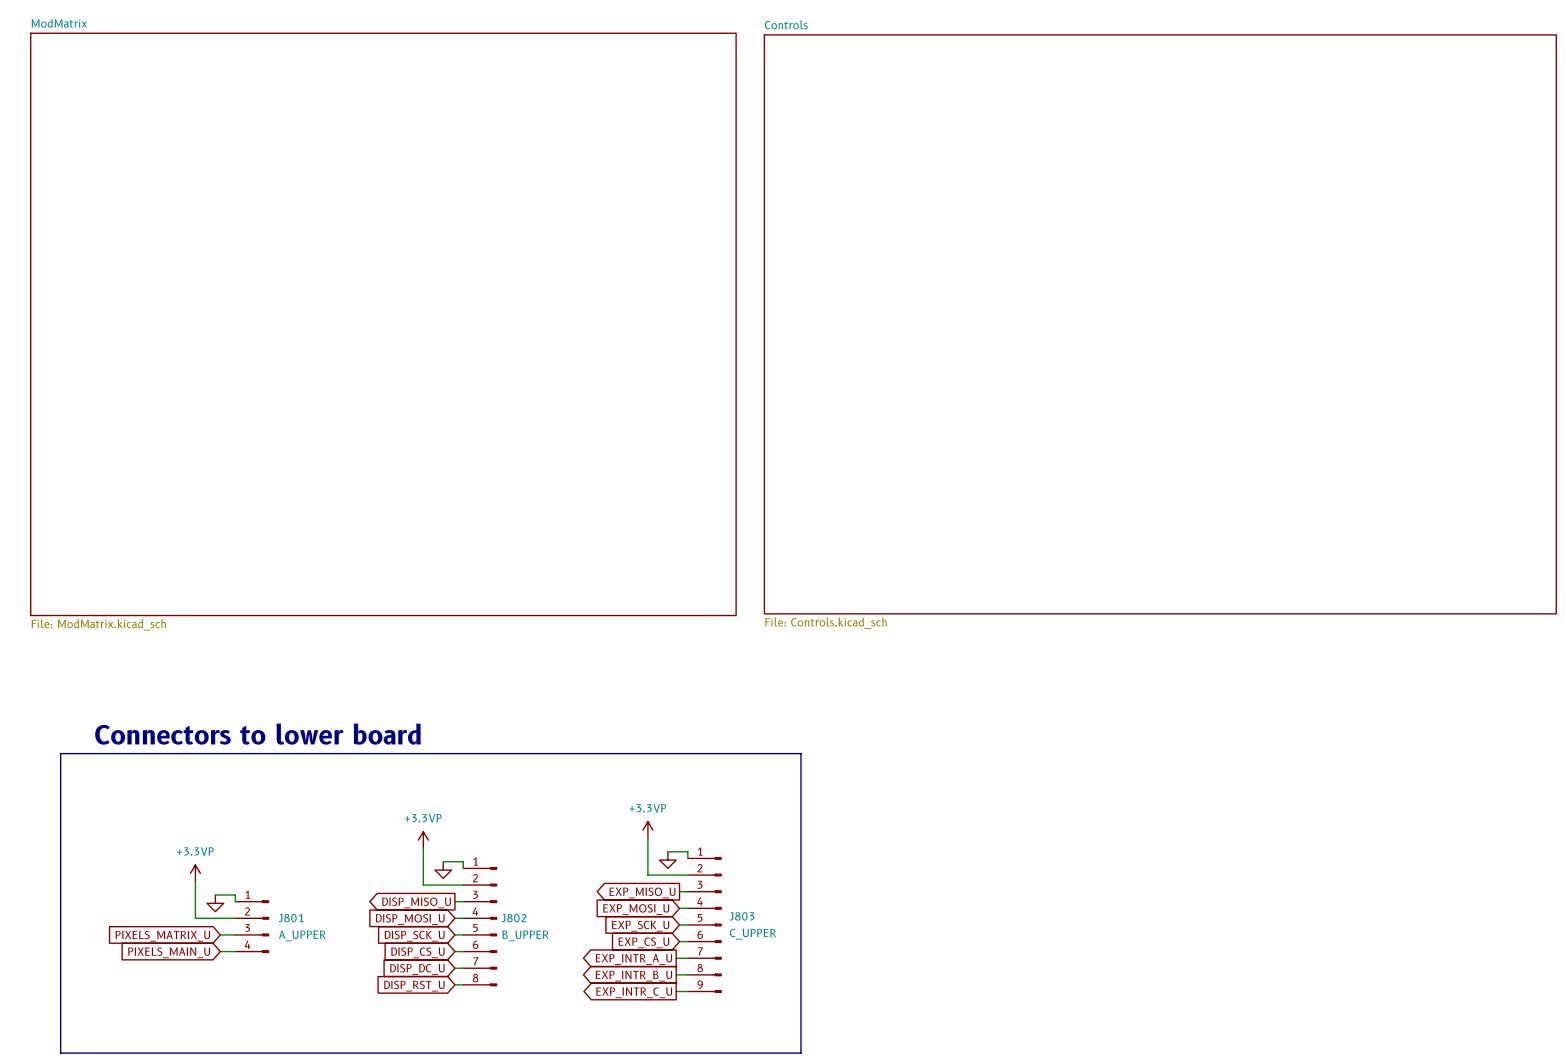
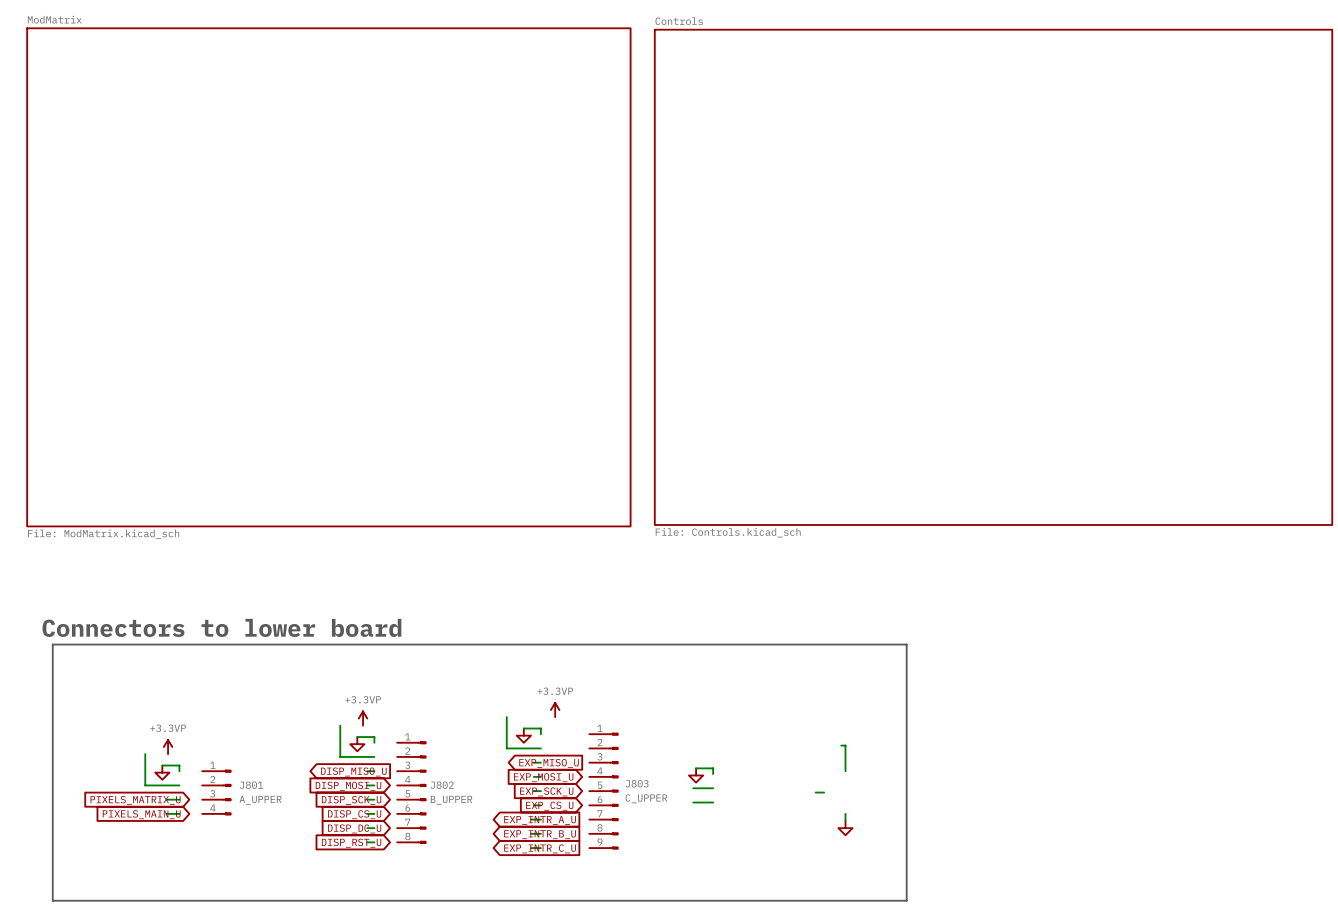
line: (800, 753) (800, 1053) -> (686, 644) (906, 644) (906, 900) (686, 900)
wire: (647, 838) (647, 875) (687, 875) -> (506, 717) (506, 748) (540, 748)
wire: (423, 848) (423, 885) -> (340, 725) (340, 756) (363, 756)
wire: (667, 851) (687, 851) (687, 858) -> (523, 728) (540, 728) (540, 734)
power symbol position: (667, 860) -> (523, 735)
wire: (443, 861) (463, 861) (463, 868) -> (357, 737) (374, 737) (374, 742)
power symbol position: (443, 870) -> (357, 744)
wire: none -> (841, 745) (845, 745) (845, 771)
wire: (195, 881) (195, 918) -> (145, 754) (145, 785) (168, 785)
wire: (436, 885) (463, 885) -> none
wire: (679, 891) (687, 891) -> (533, 762) (540, 762)
wire: (215, 895) (235, 895) (235, 901) -> (162, 765) (179, 765) (179, 771)
wire: none -> (696, 768) (713, 768) (713, 774)
wire: (454, 901) (463, 901) -> (367, 771) (374, 771)
power symbol position: (215, 903) -> (162, 772)
power symbol: none -> (696, 775)
wire: (679, 908) (687, 908) -> (533, 776) (540, 776)
wire: (208, 918) (235, 918) -> none
wire: (454, 918) (463, 918) -> (367, 785) (374, 785)
wire: none -> (693, 788) (713, 788)
wire: (679, 924) (687, 924) -> (533, 791) (540, 791)
wire: none -> (815, 792) (824, 792)
wire: (220, 934) (235, 934) -> (166, 799) (179, 799)
wire: (454, 934) (463, 934) -> (367, 799) (374, 799)
wire: none -> (693, 802) (713, 802)
wire: (679, 941) (687, 941) -> (533, 805) (540, 805)
wire: (220, 951) (235, 951) -> (166, 813) (179, 813)
wire: (454, 951) (463, 951) -> (367, 813) (374, 813)
wire: none -> (845, 813) (845, 821)
wire: (676, 958) (687, 958) -> (530, 819) (540, 819)
wire: (454, 968) (463, 968) -> (367, 828) (374, 828)
power symbol: none -> (845, 828)
wire: (676, 974) (687, 974) -> (530, 833) (540, 833)
wire: (454, 984) (463, 984) -> (367, 842) (374, 842)
wire: (676, 991) (687, 991) -> (530, 848) (540, 848)

